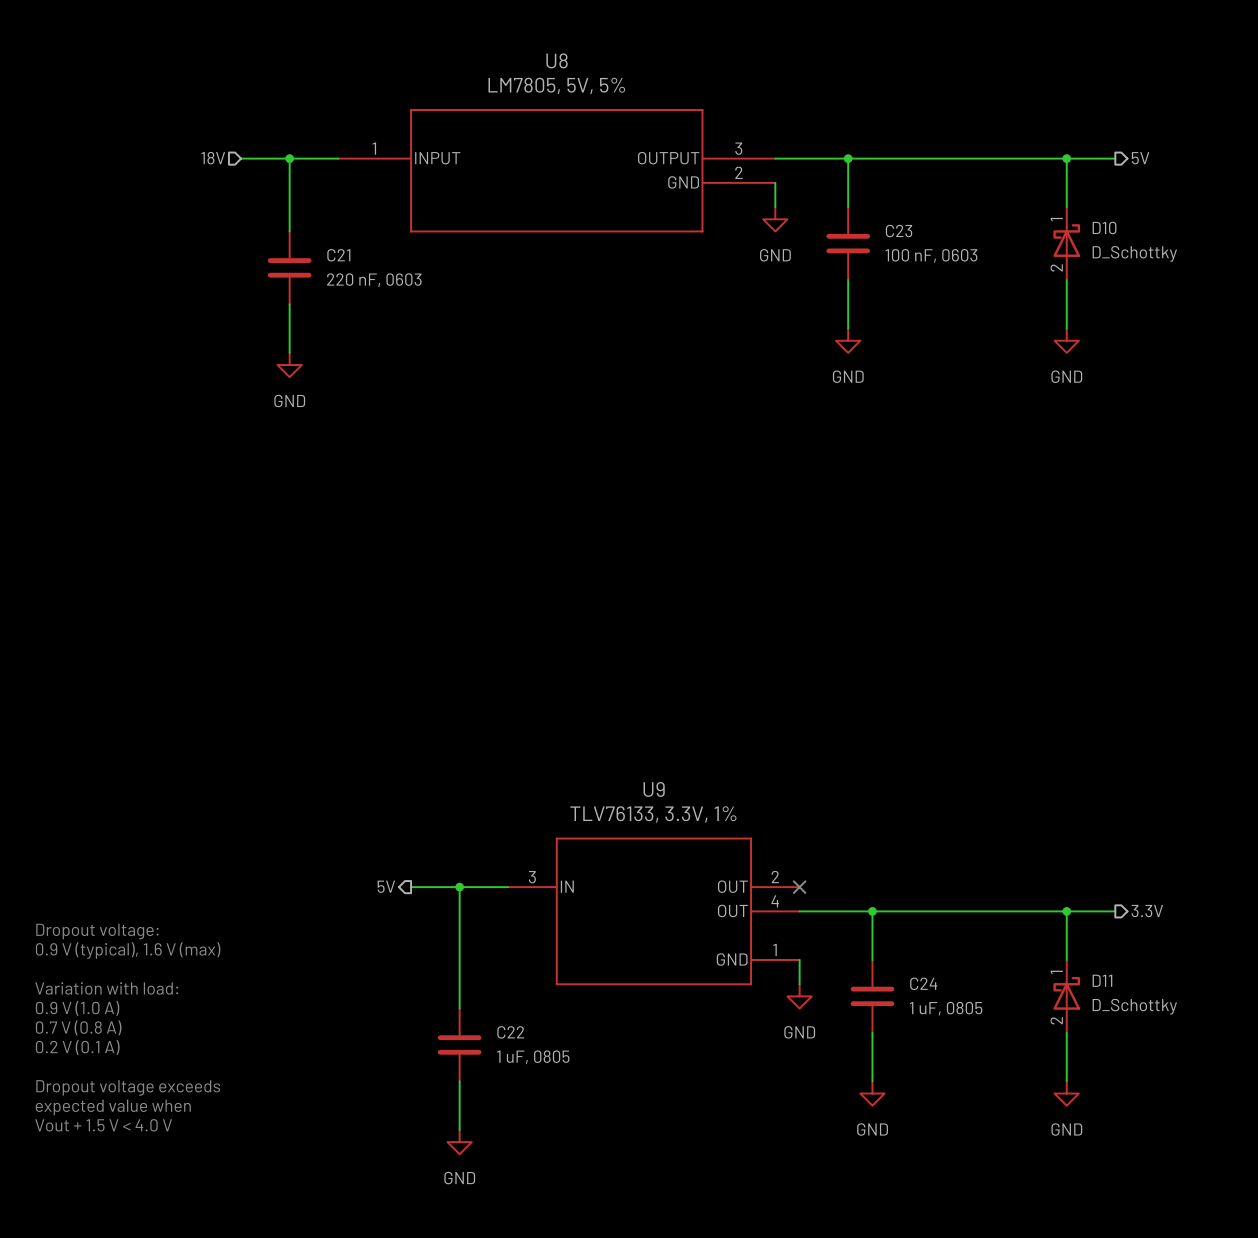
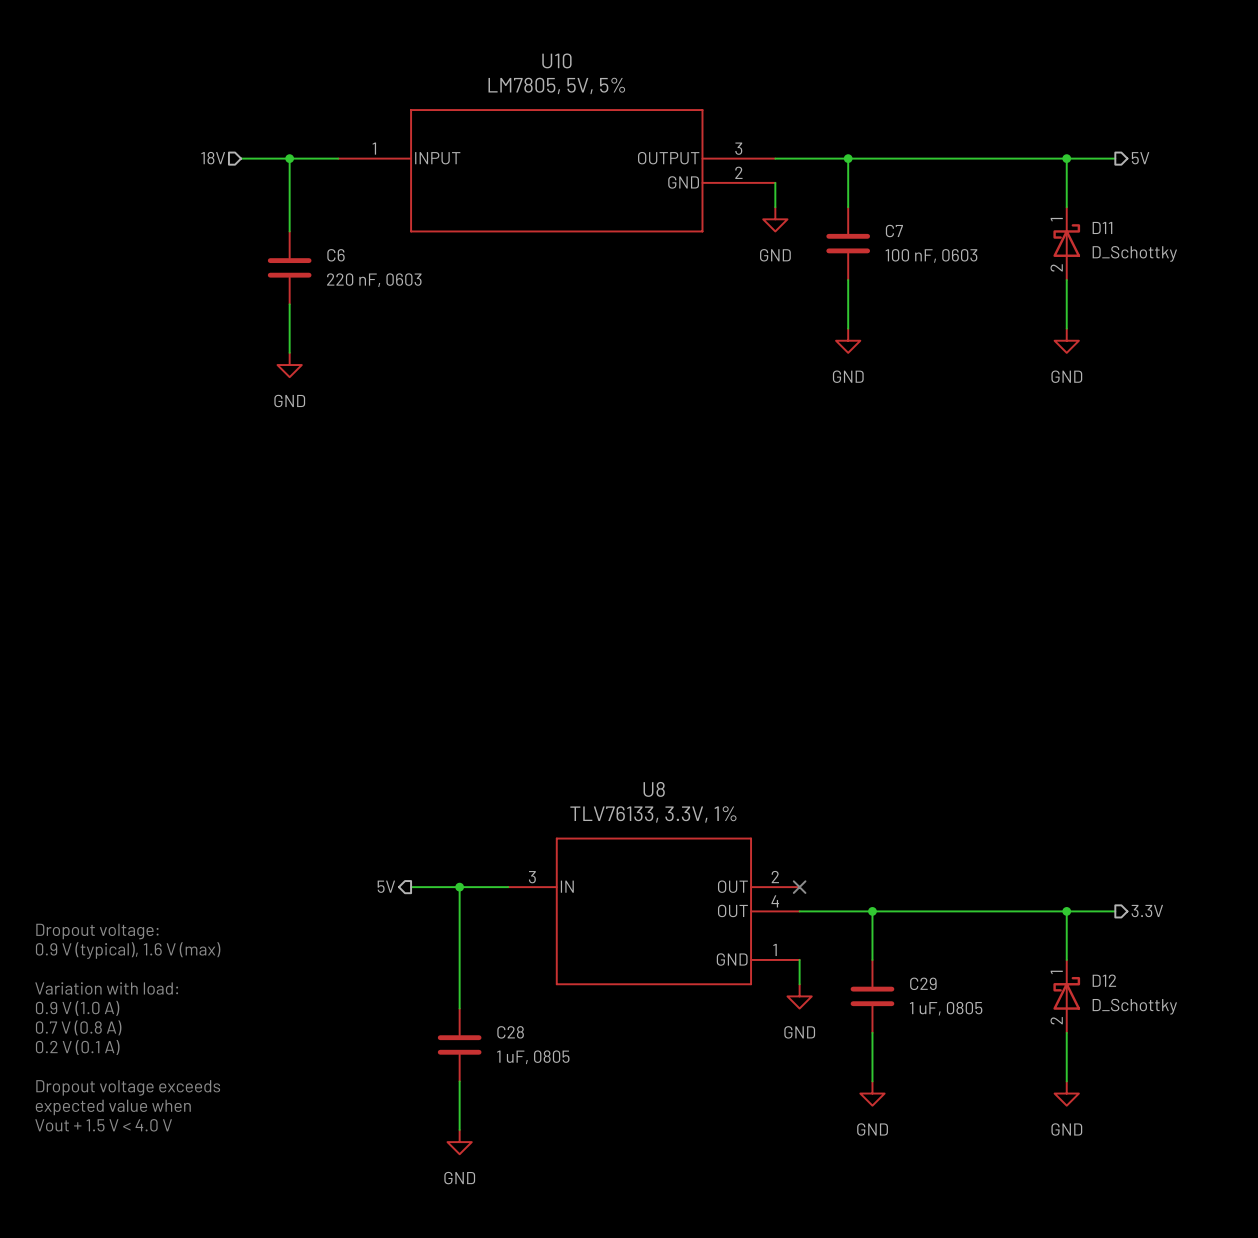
U8 name: U8 (557, 60) -> U10 (556, 60)
D10 name: D10 (1104, 227) -> D11 (1102, 227)
C23 name: C23 (899, 231) -> C7 (894, 231)
C21 name: C21 (338, 255) -> C6 (336, 255)
U9 name: U9 (654, 789) -> U8 (654, 789)
D11 name: D11 (1102, 980) -> D12 (1104, 980)
C24 name: C24 (923, 983) -> C29 (923, 983)
C22 name: C22 (510, 1032) -> C28 (510, 1032)

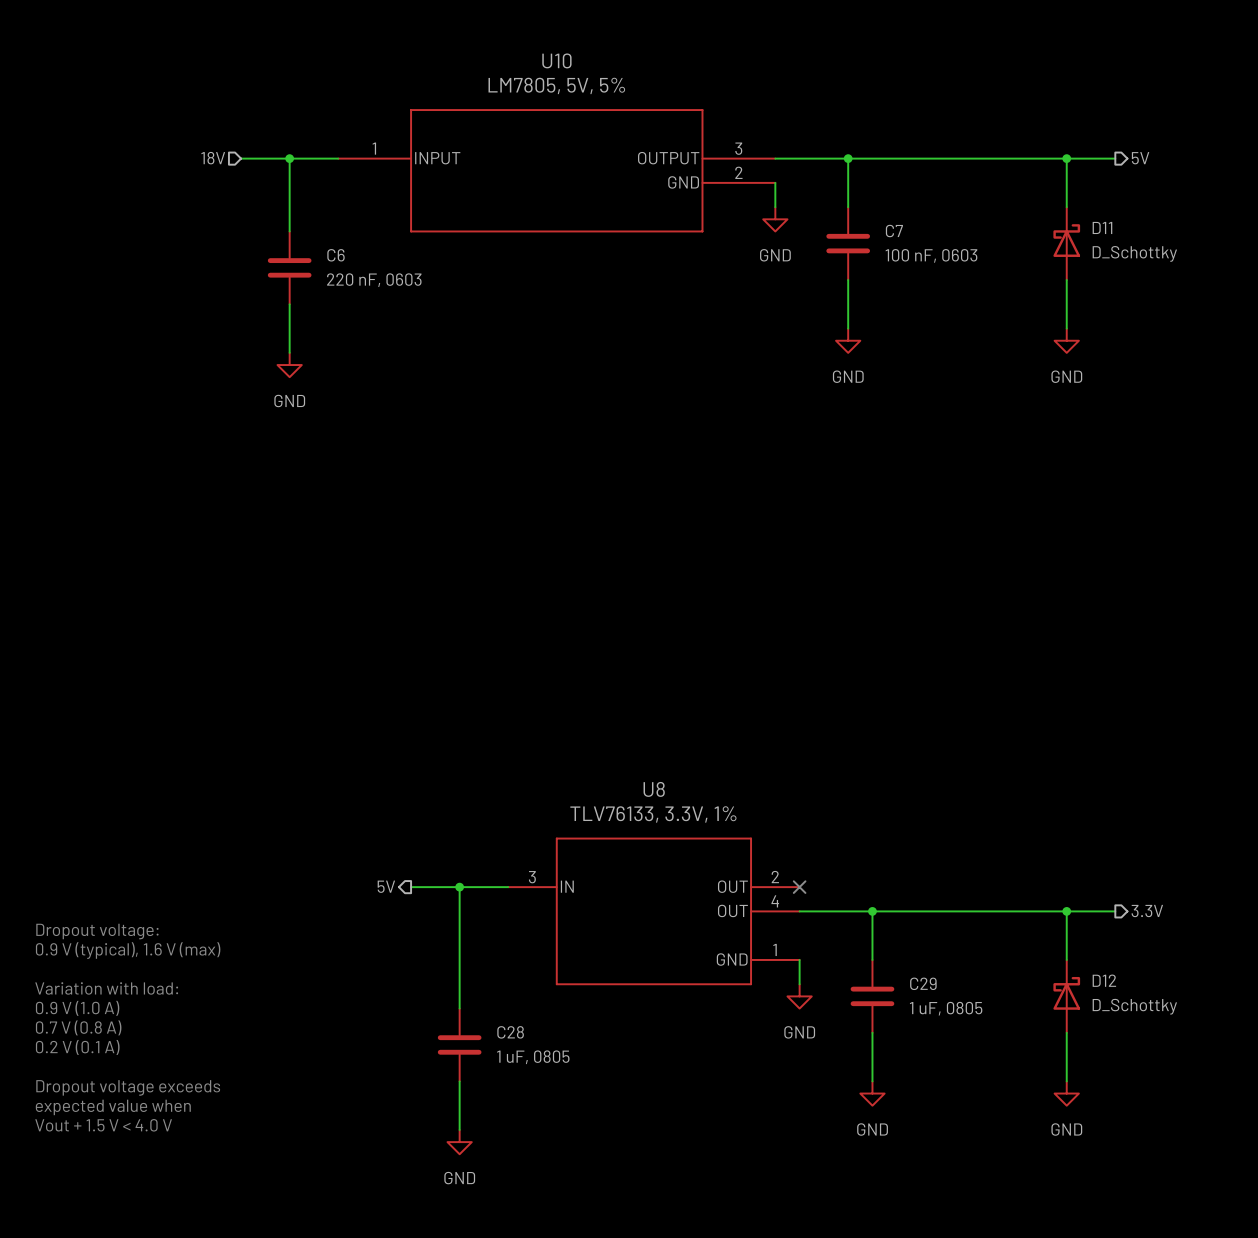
D11 pin number: 1 (1056, 219) -> none
D11 pin number: 2 (1056, 267) -> none
D12 pin number: 1 (1056, 972) -> none
D12 pin number: 2 (1056, 1020) -> none

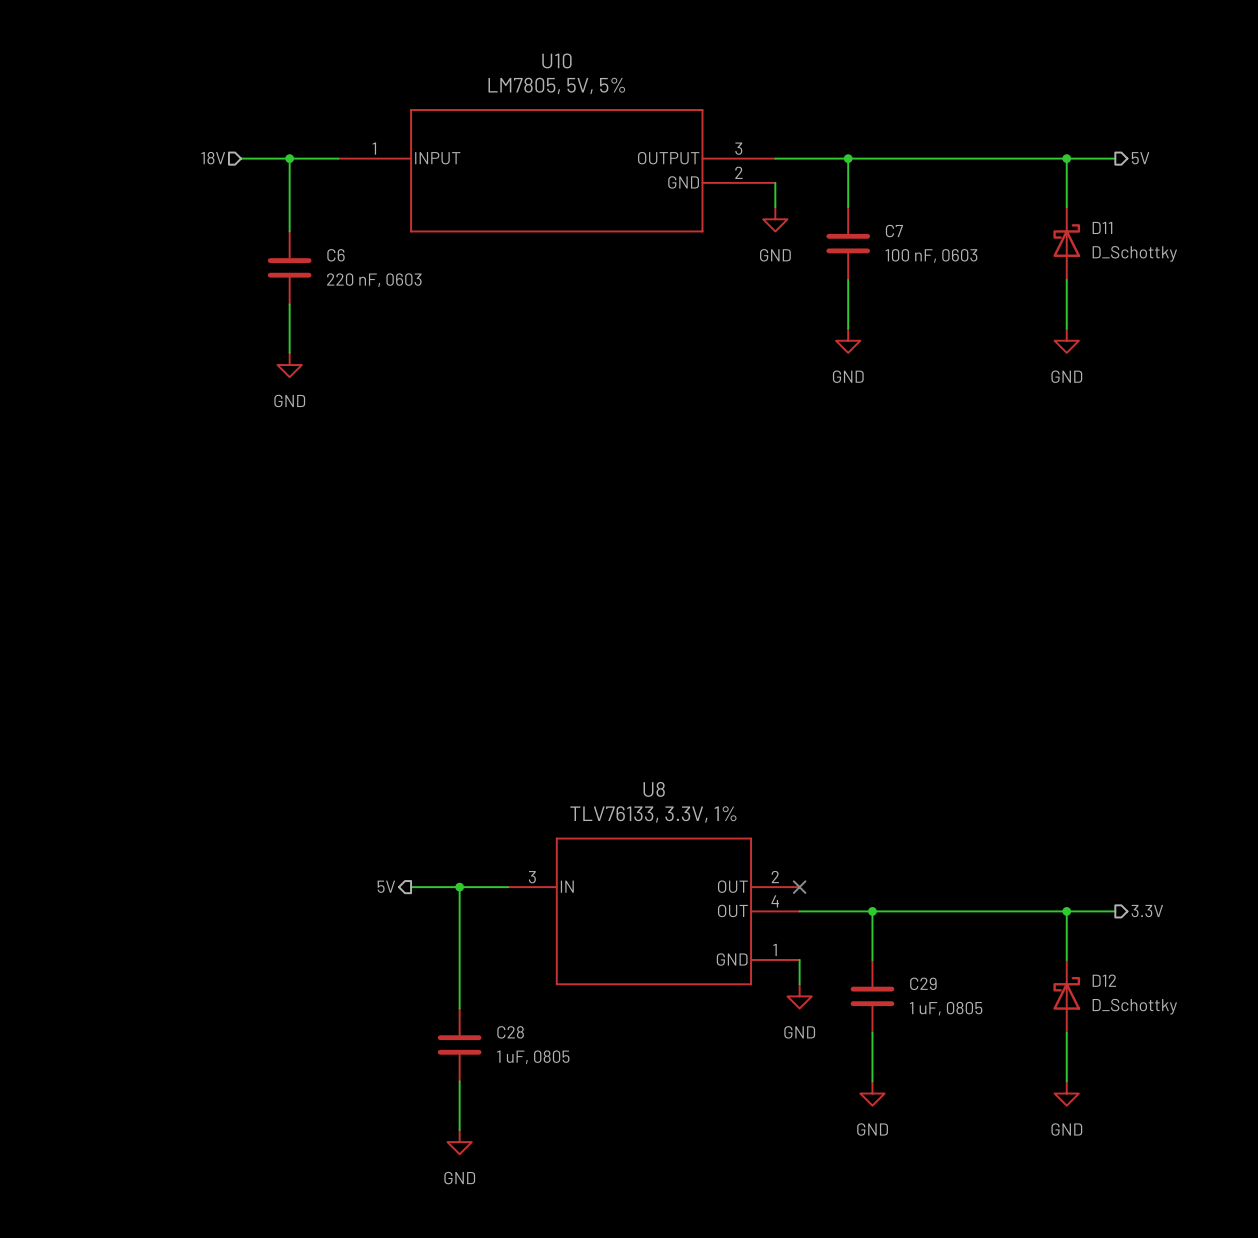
text: Dropout voltage: (97, 931) -> none
text: 0.9 V (typical), 1.6 V (max) (128, 950) -> none
text: Variation with load: (106, 988) -> none
text: 0.9 V (1.0 A) (77, 1008) -> none
text: 0.7 V (0.8 A) (78, 1027) -> none
text: 0.2 V (0.1 A) (77, 1047) -> none
text: Dropout voltage exceeds (128, 1087) -> none
text: expected value when (113, 1107) -> none
text: Vout + 1.5 V < 4.0 V (103, 1125) -> none

